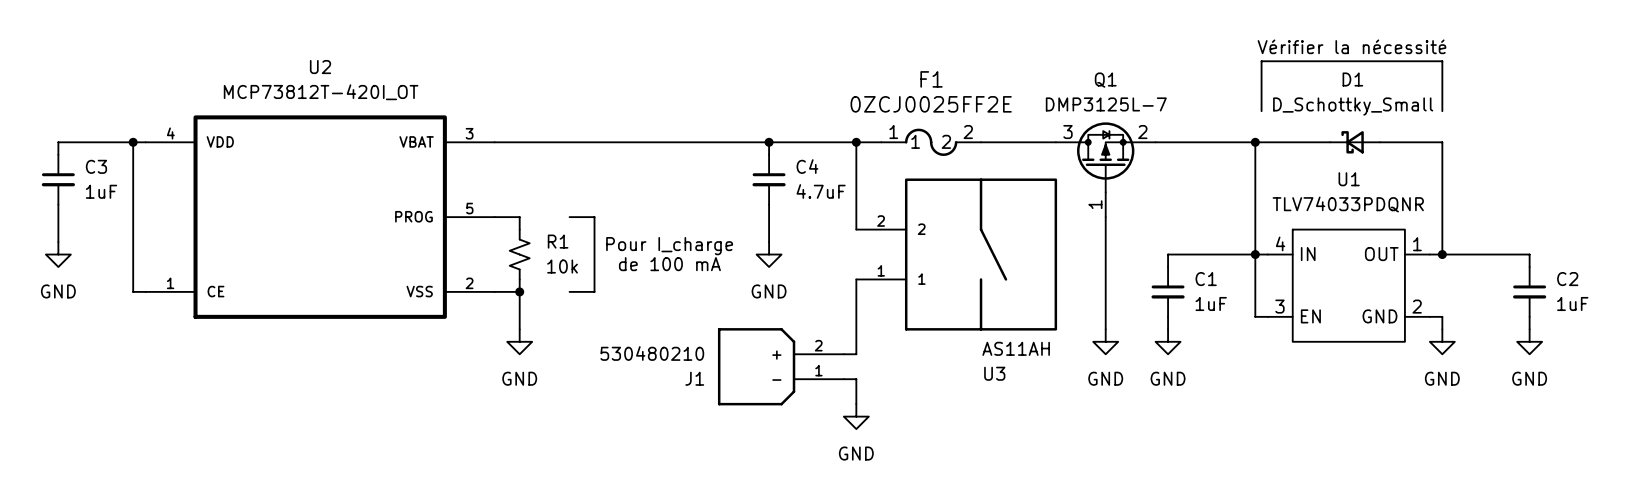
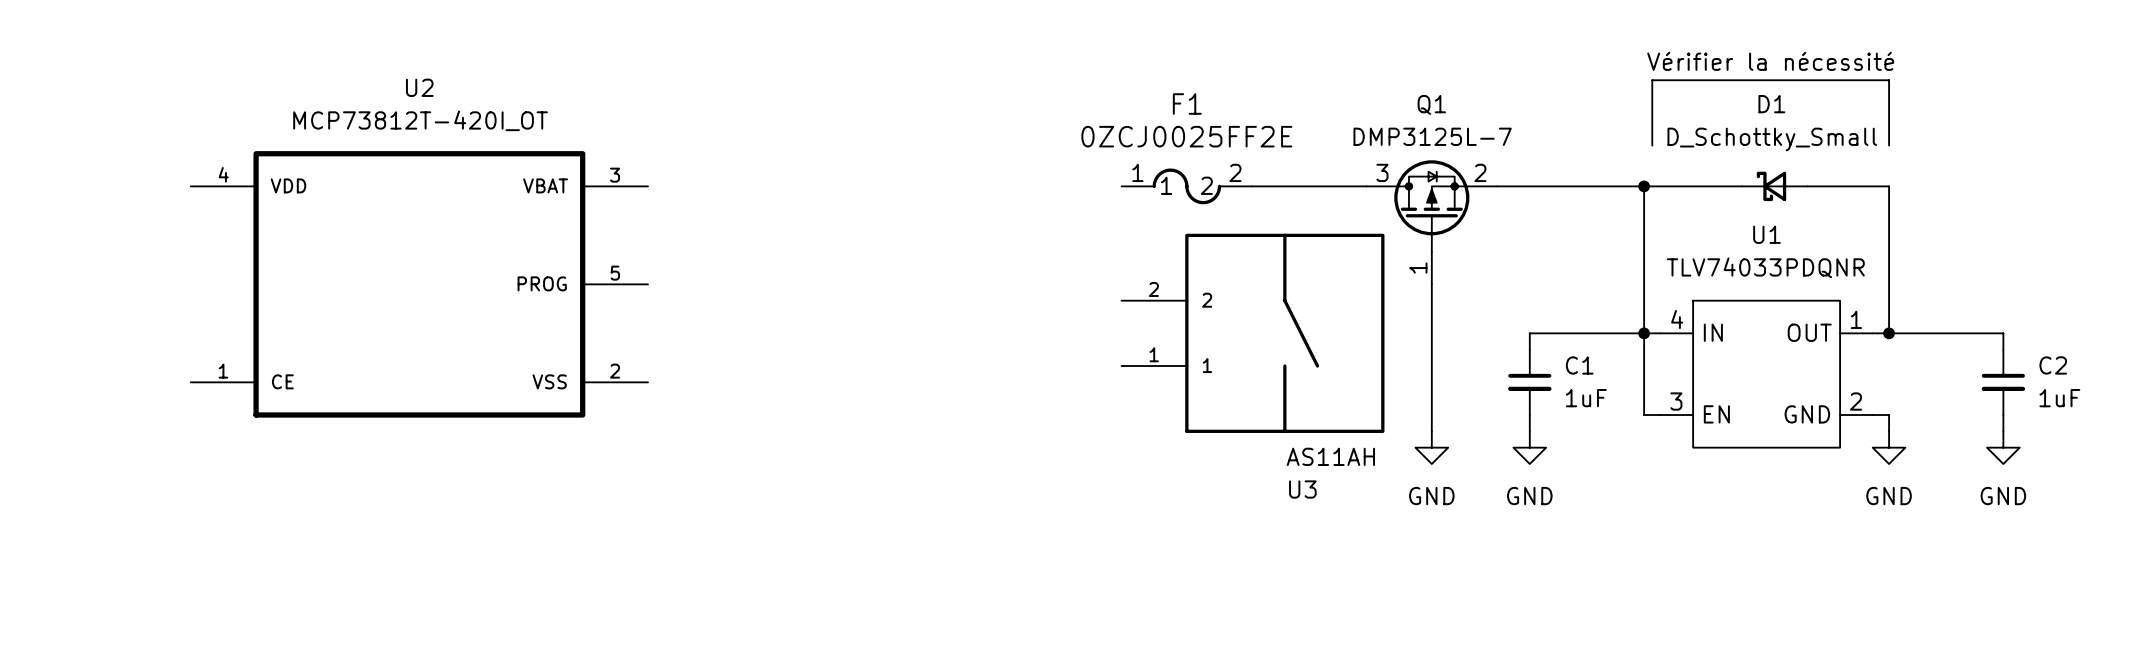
wire: (133, 142) (133, 291) (145, 291) -> none
junction: (133, 142) -> none
wire: (145, 142) (58, 142) (58, 154) -> none
wire: (494, 142) (881, 142) -> none
wire: (769, 142) (769, 154) -> none
junction: (769, 142) -> none
wire: (856, 142) (856, 229) -> none
junction: (856, 142) -> none
F1 position: (931, 142) -> (1186, 186)
Q1 position: (1105, 169) -> (1431, 222)
C3: 1uF (58, 179) -> none
C4: 4.7uF (769, 179) -> none
wire: (58, 204) (58, 242) -> none
wire: (769, 204) (769, 242) -> none
wire: (494, 217) (519, 217) (519, 229) -> none
line: (569, 217) (594, 217) (594, 291) (569, 291) -> none
wire: (1105, 217) (1105, 329) -> (1431, 284) (1431, 431)
text: Pour I_charge (669, 246) -> none
power symbol: GND (58, 254) -> none
R1: 10k (519, 254) -> none
power symbol: GND (769, 254) -> none
text: de 100 mA (669, 264) -> none
wire: (519, 279) (519, 329) -> none
wire: (856, 279) (856, 354) (843, 354) -> none
wire: (494, 291) (519, 291) -> none
junction: (519, 291) -> none
power symbol: GND (519, 341) -> none
power symbol position: GND (1105, 341) -> GND (1431, 447)
J1: 530480210 (780, 366) -> none
wire: (843, 379) (856, 379) (856, 404) -> none
power symbol: GND (856, 416) -> none

